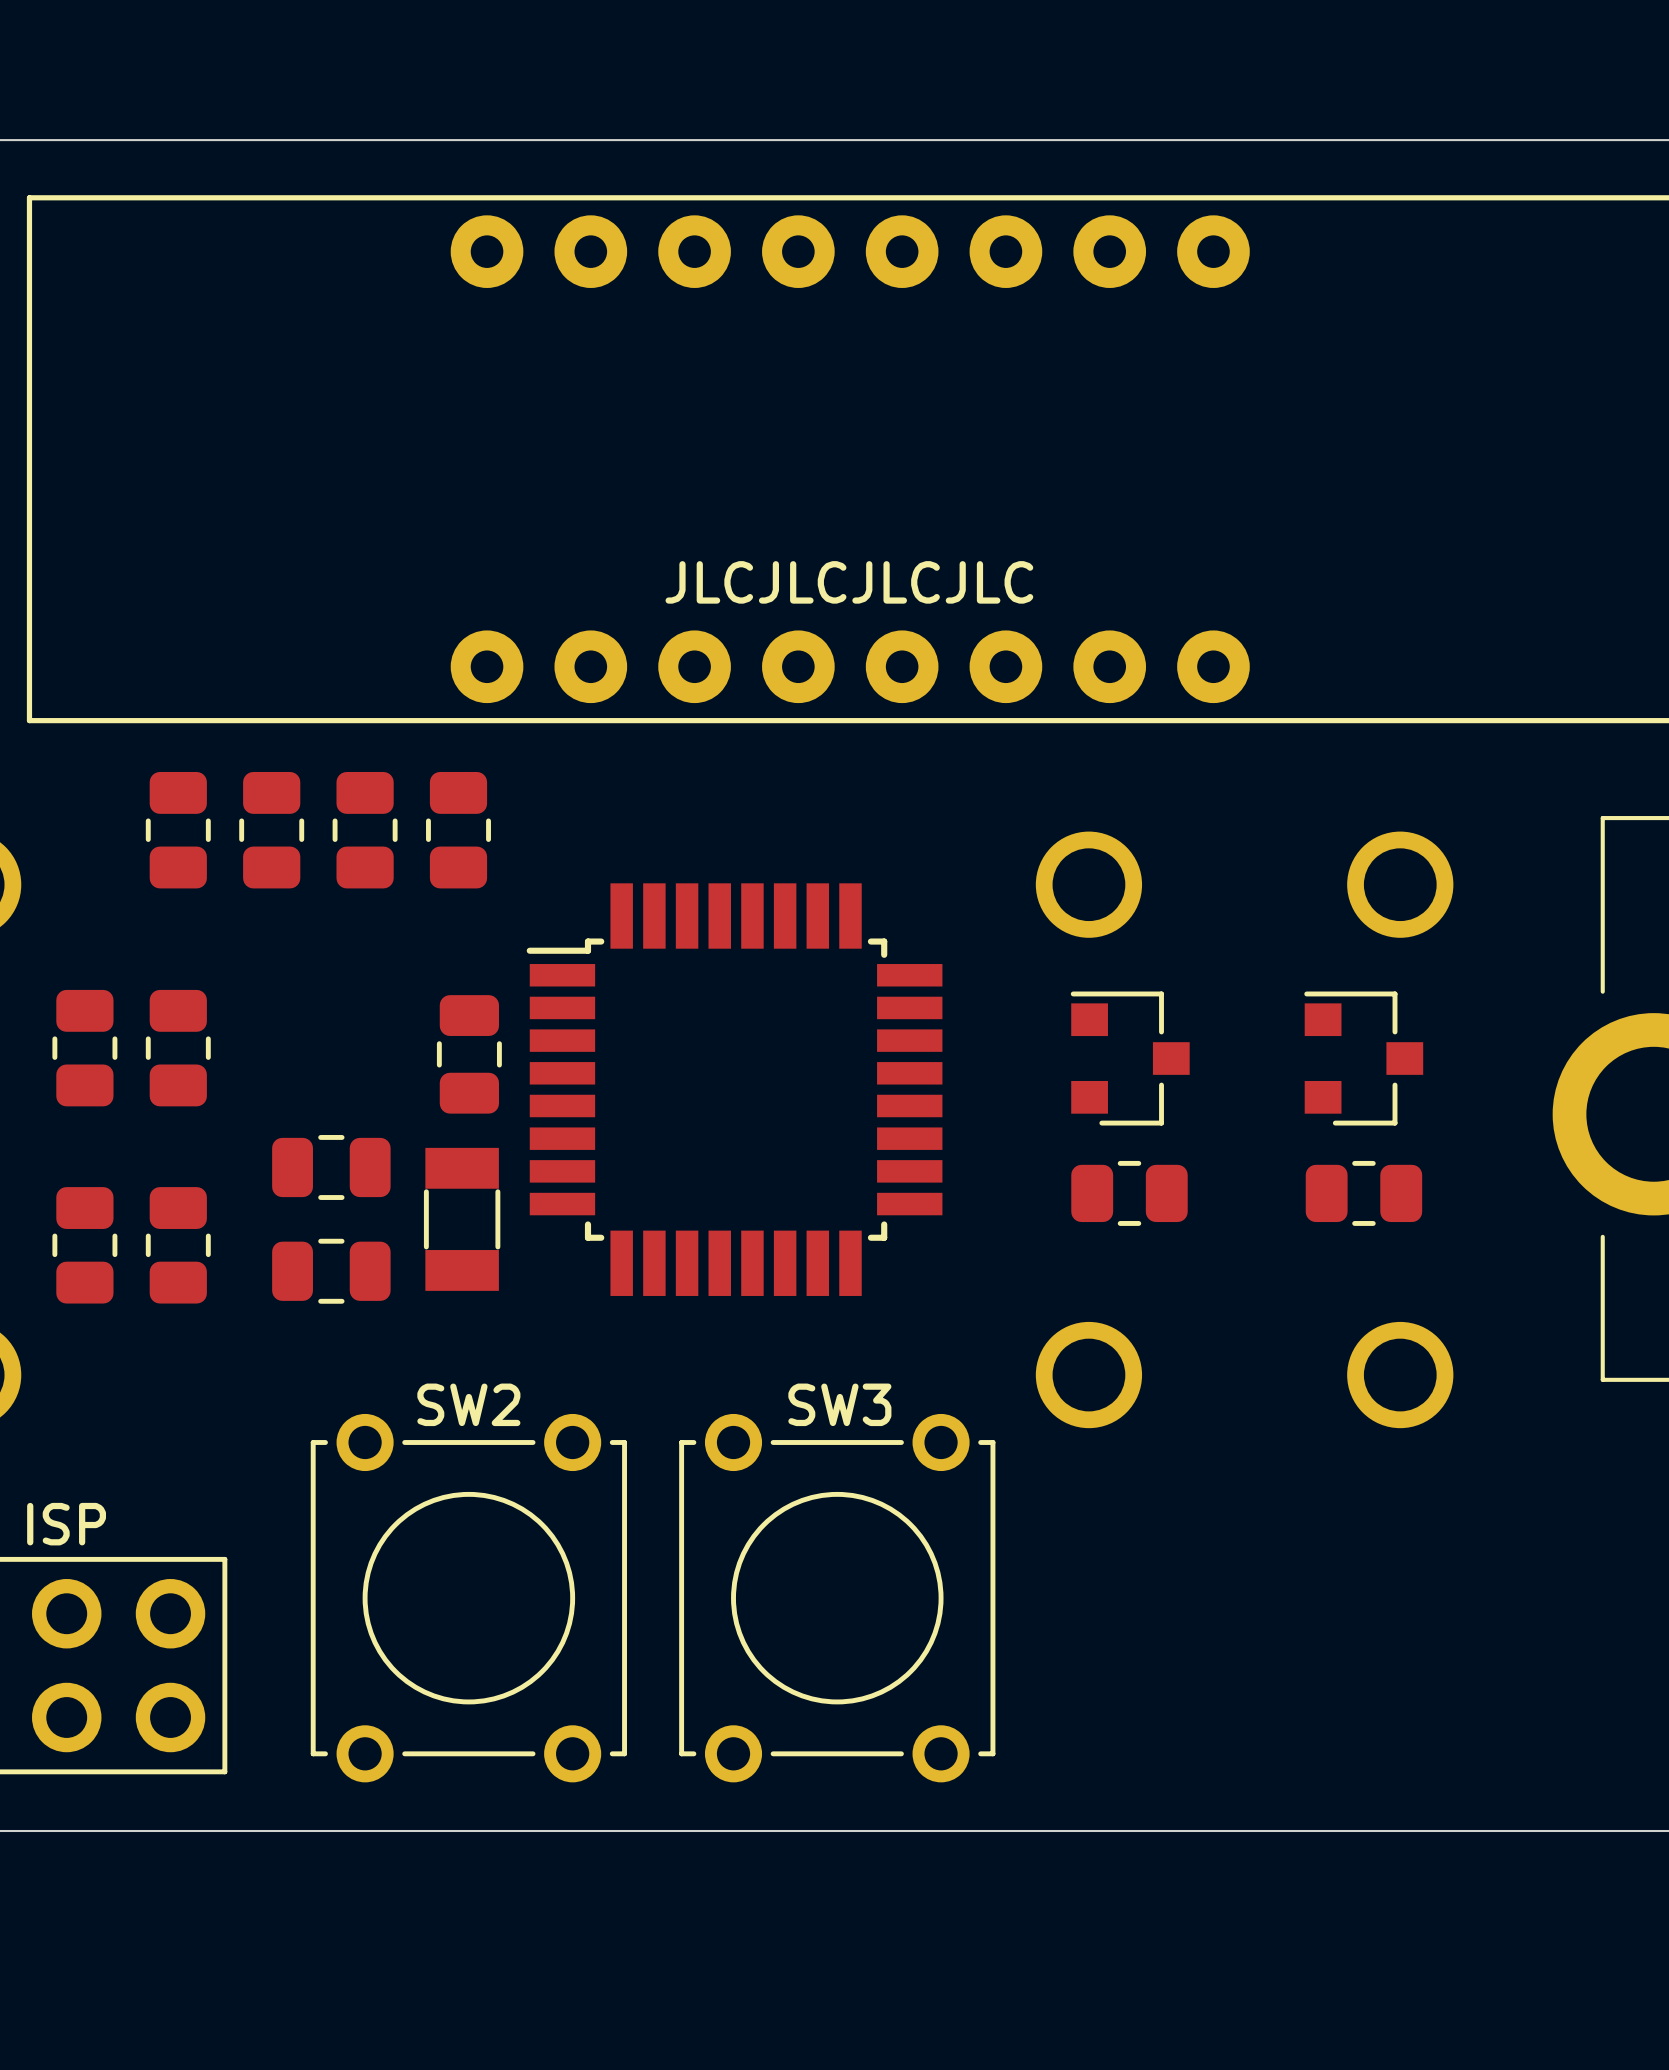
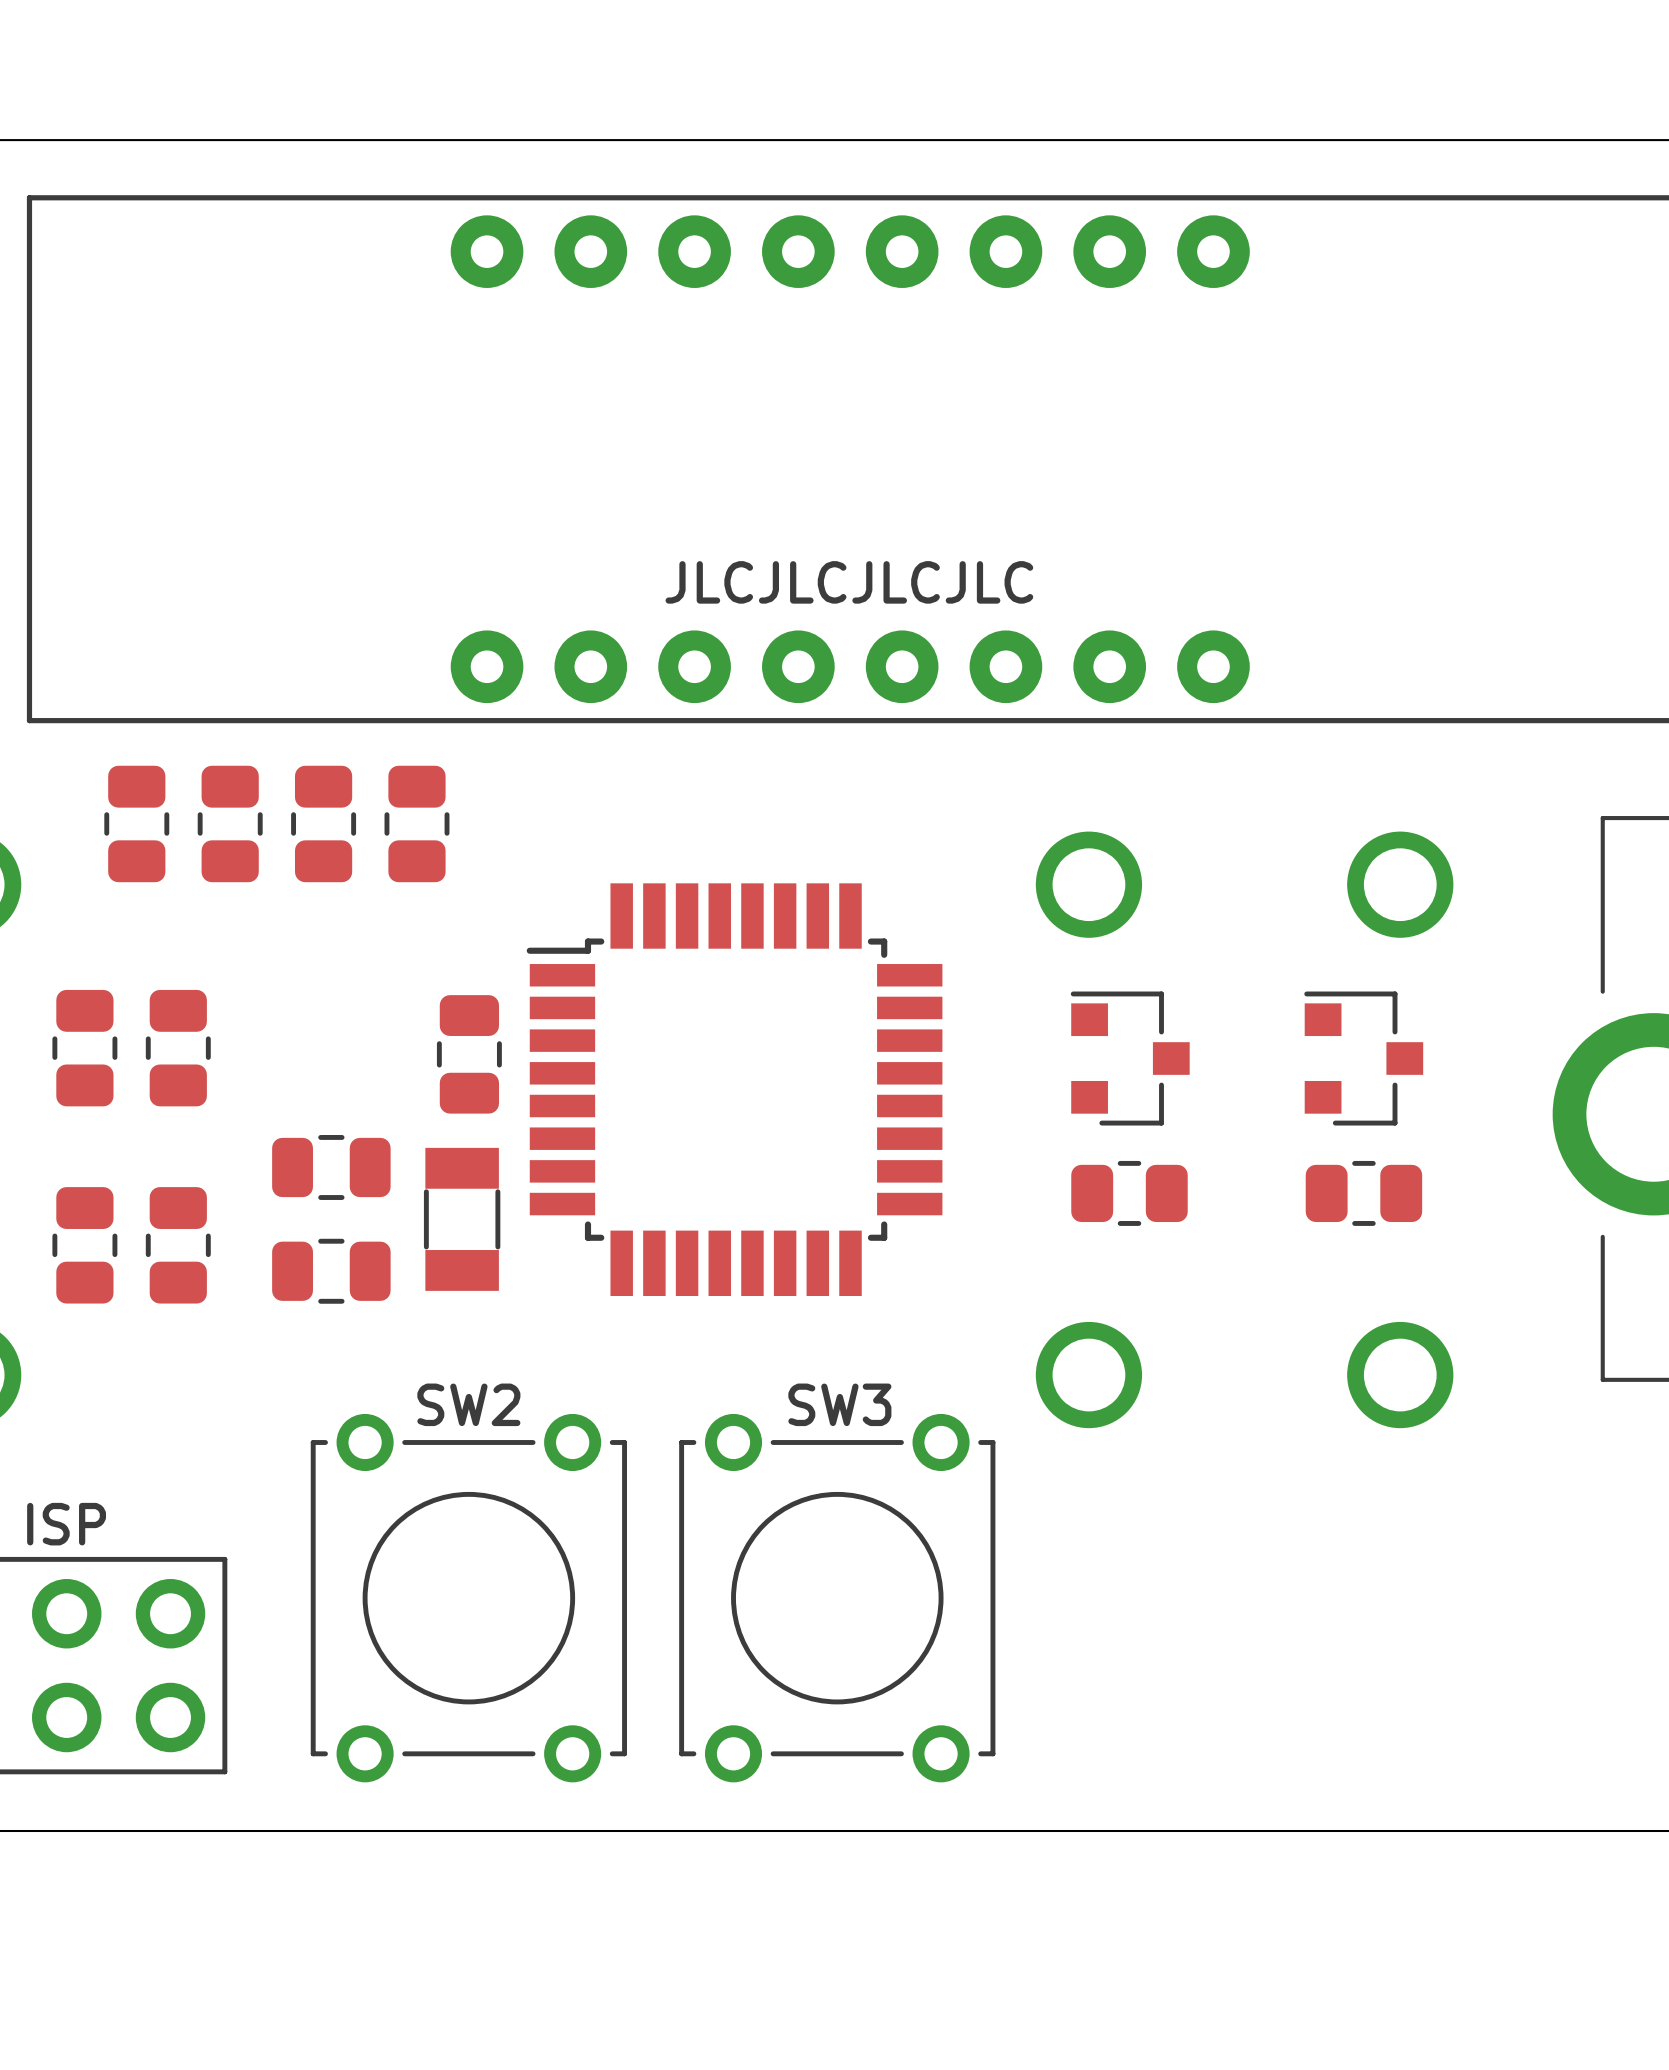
part: none -> (136, 823)
part: none -> (230, 823)
part: none -> (323, 823)
part: none -> (416, 823)
part: (178, 830) -> none
part: (271, 830) -> none
part: (365, 830) -> none
part: (458, 830) -> none

